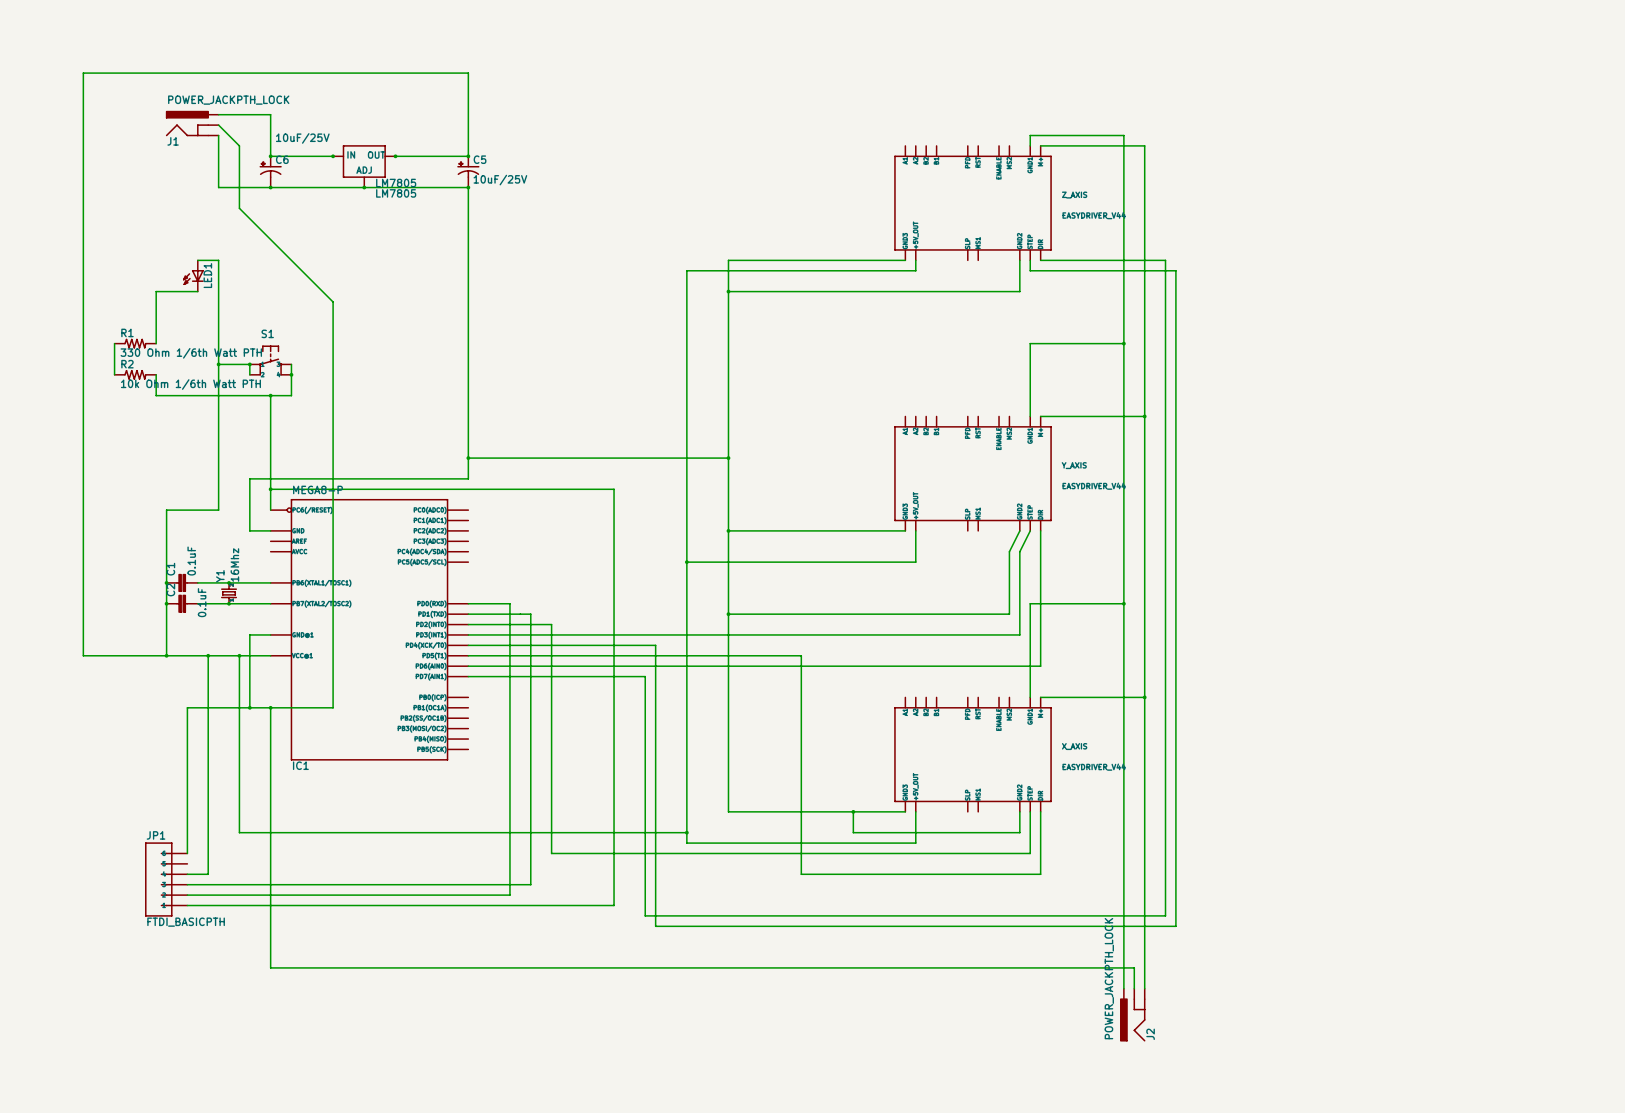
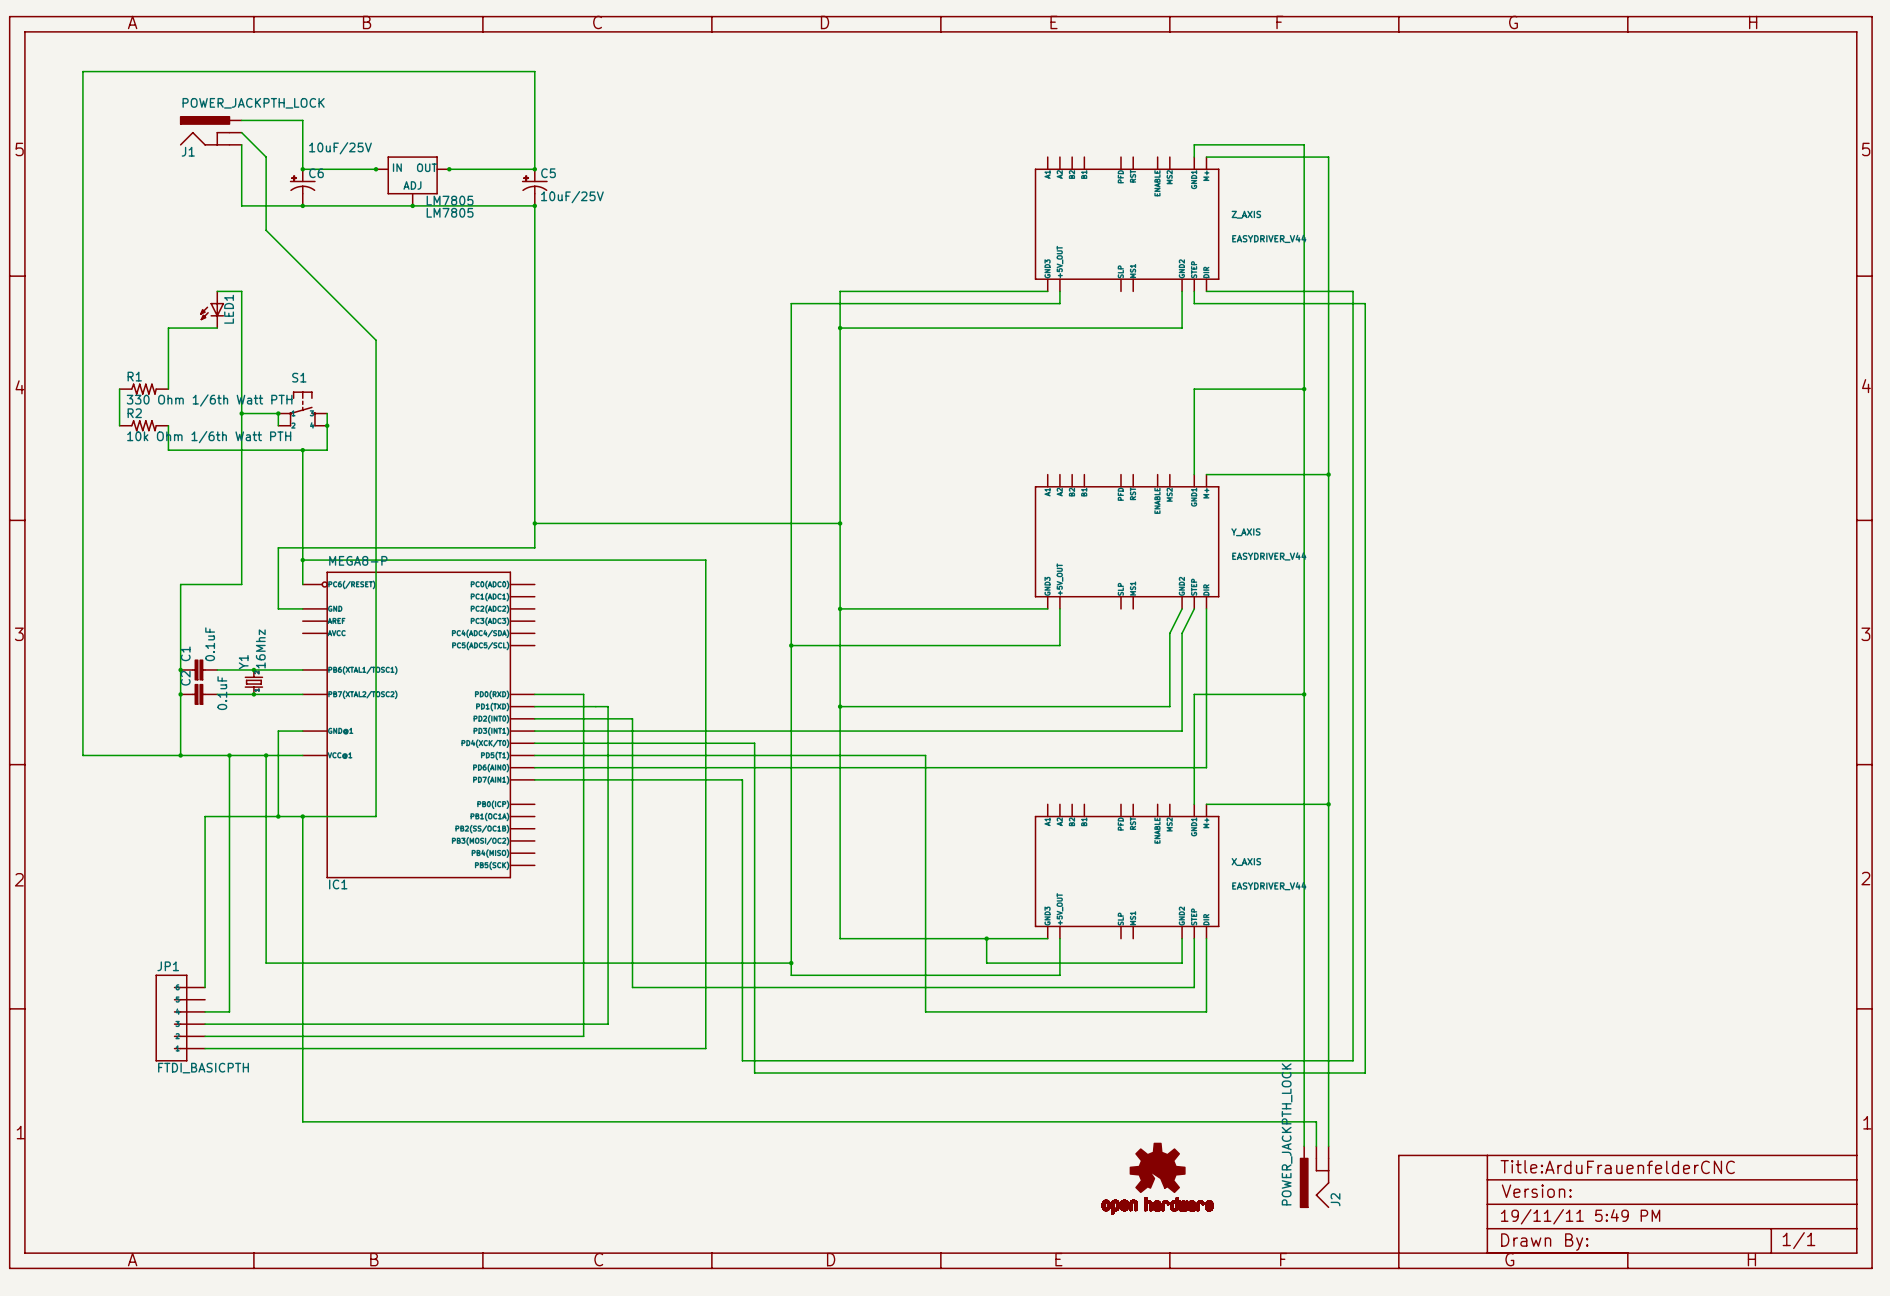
part: none -> (940, 642)
part: none -> (1157, 1178)

